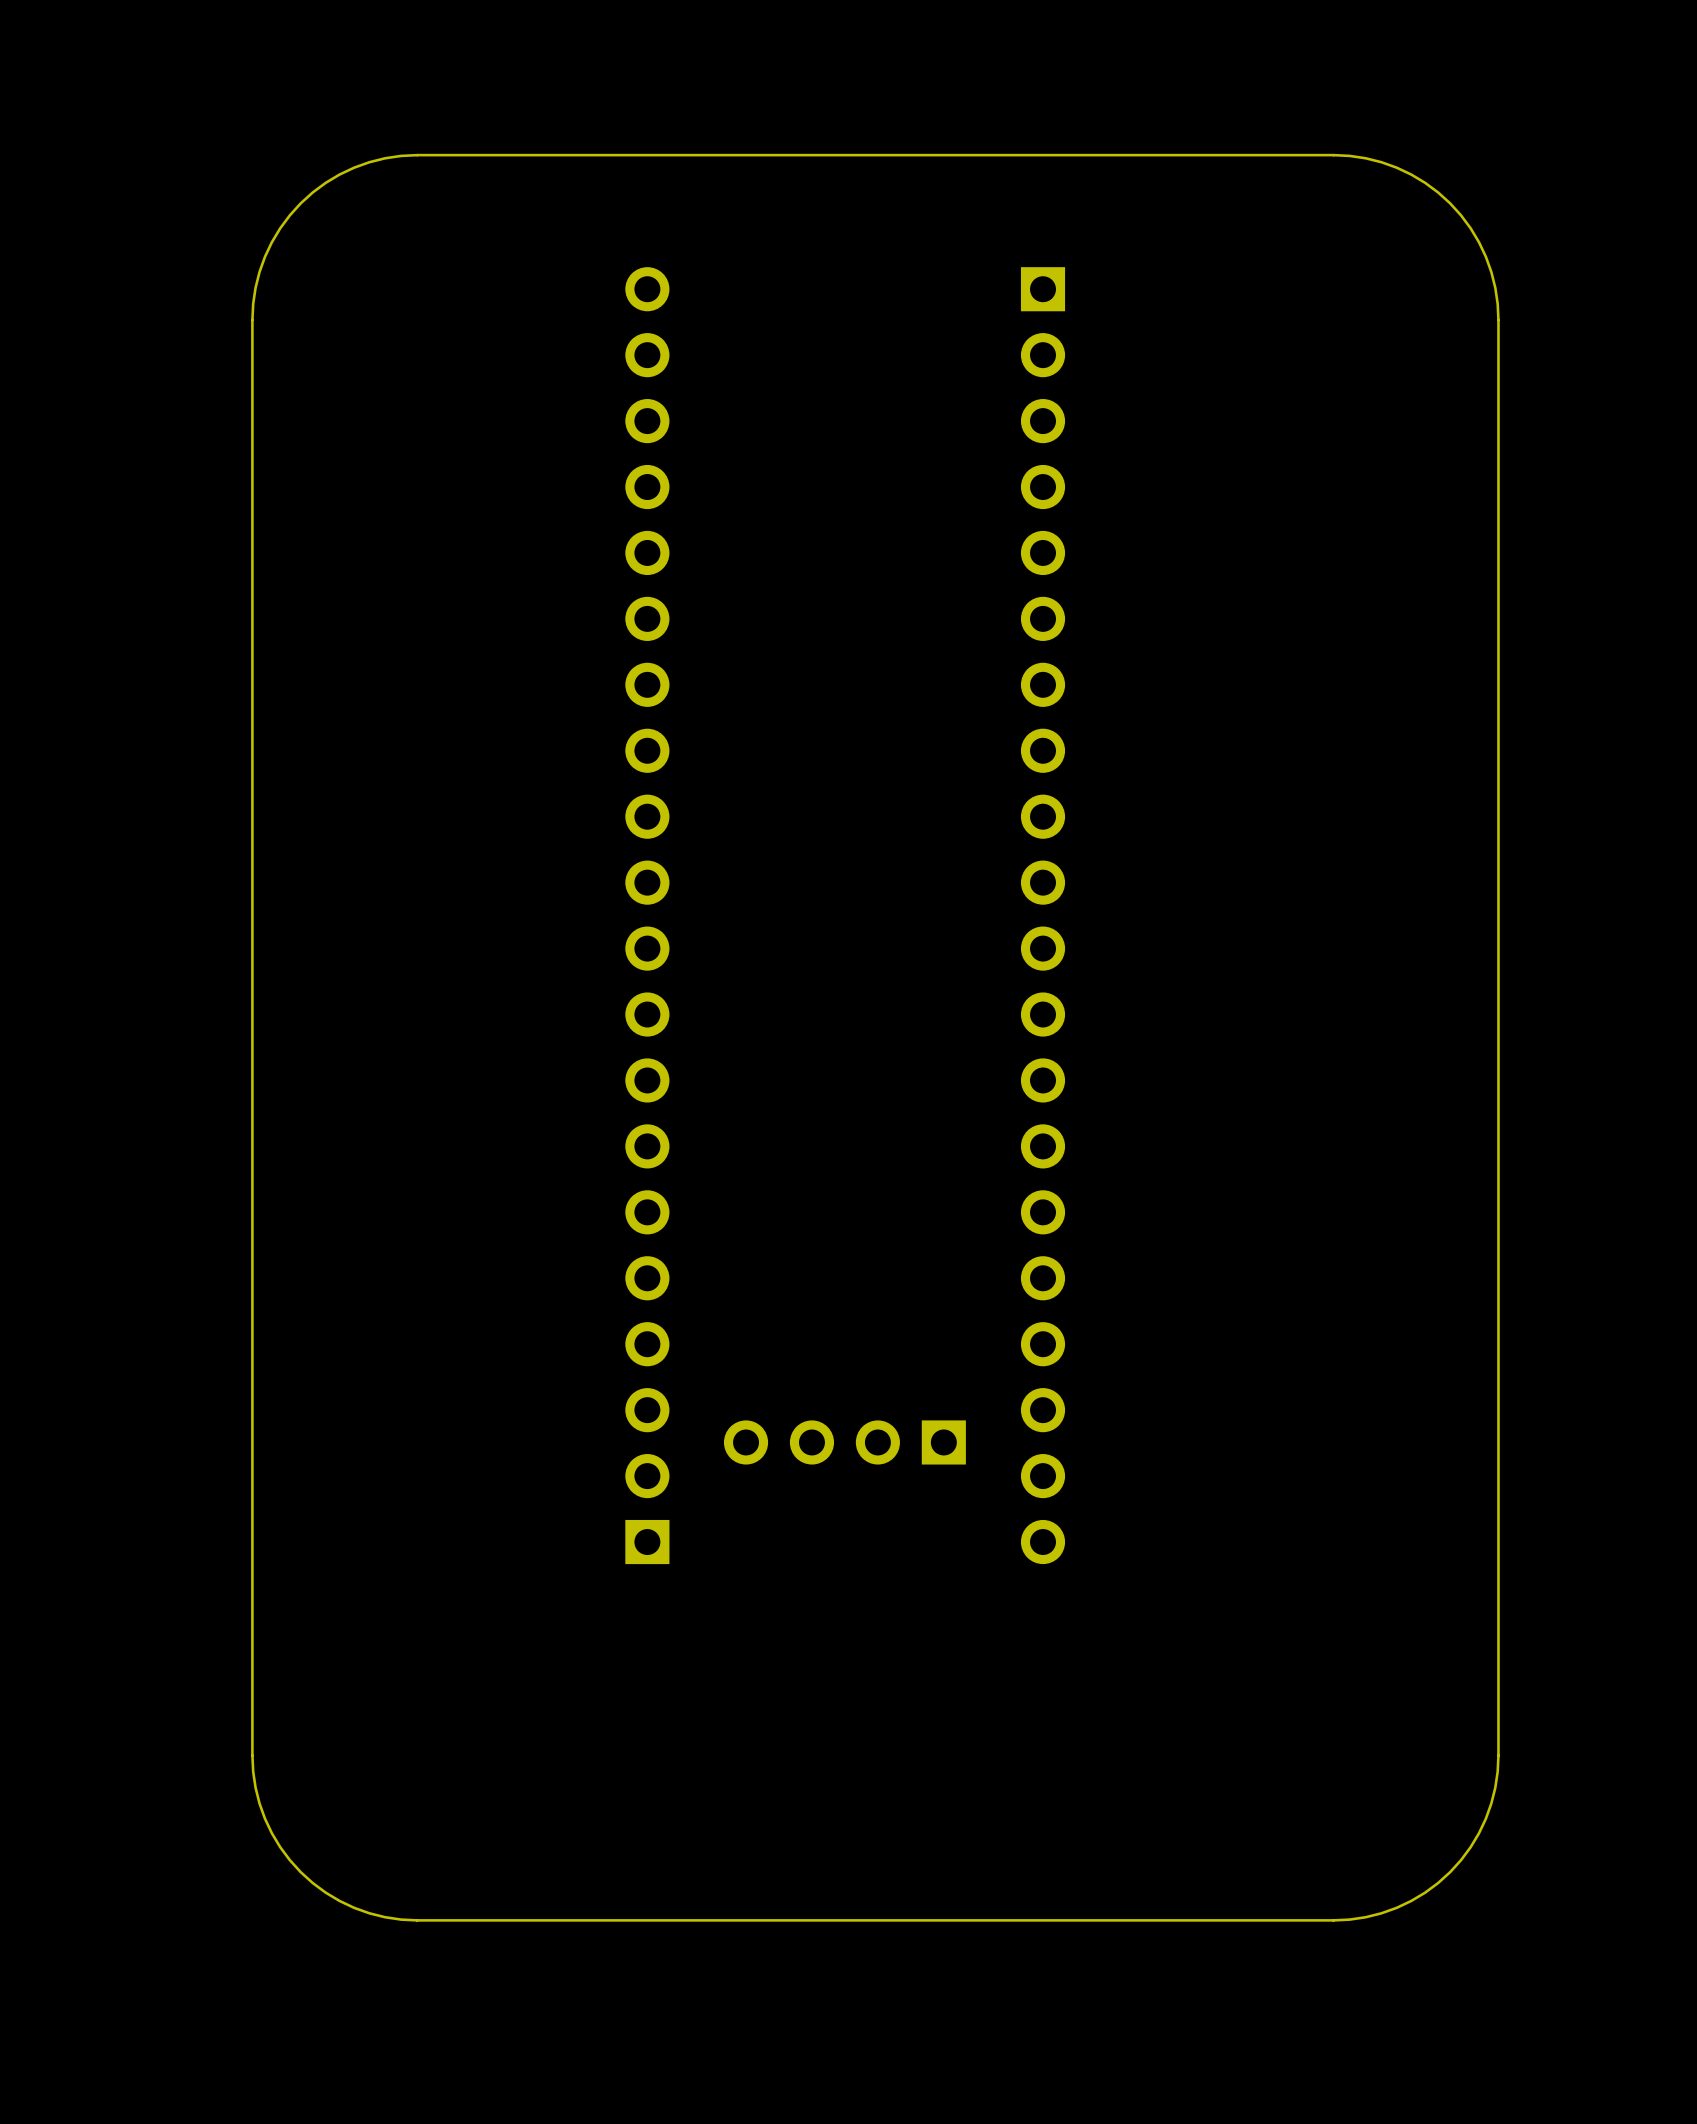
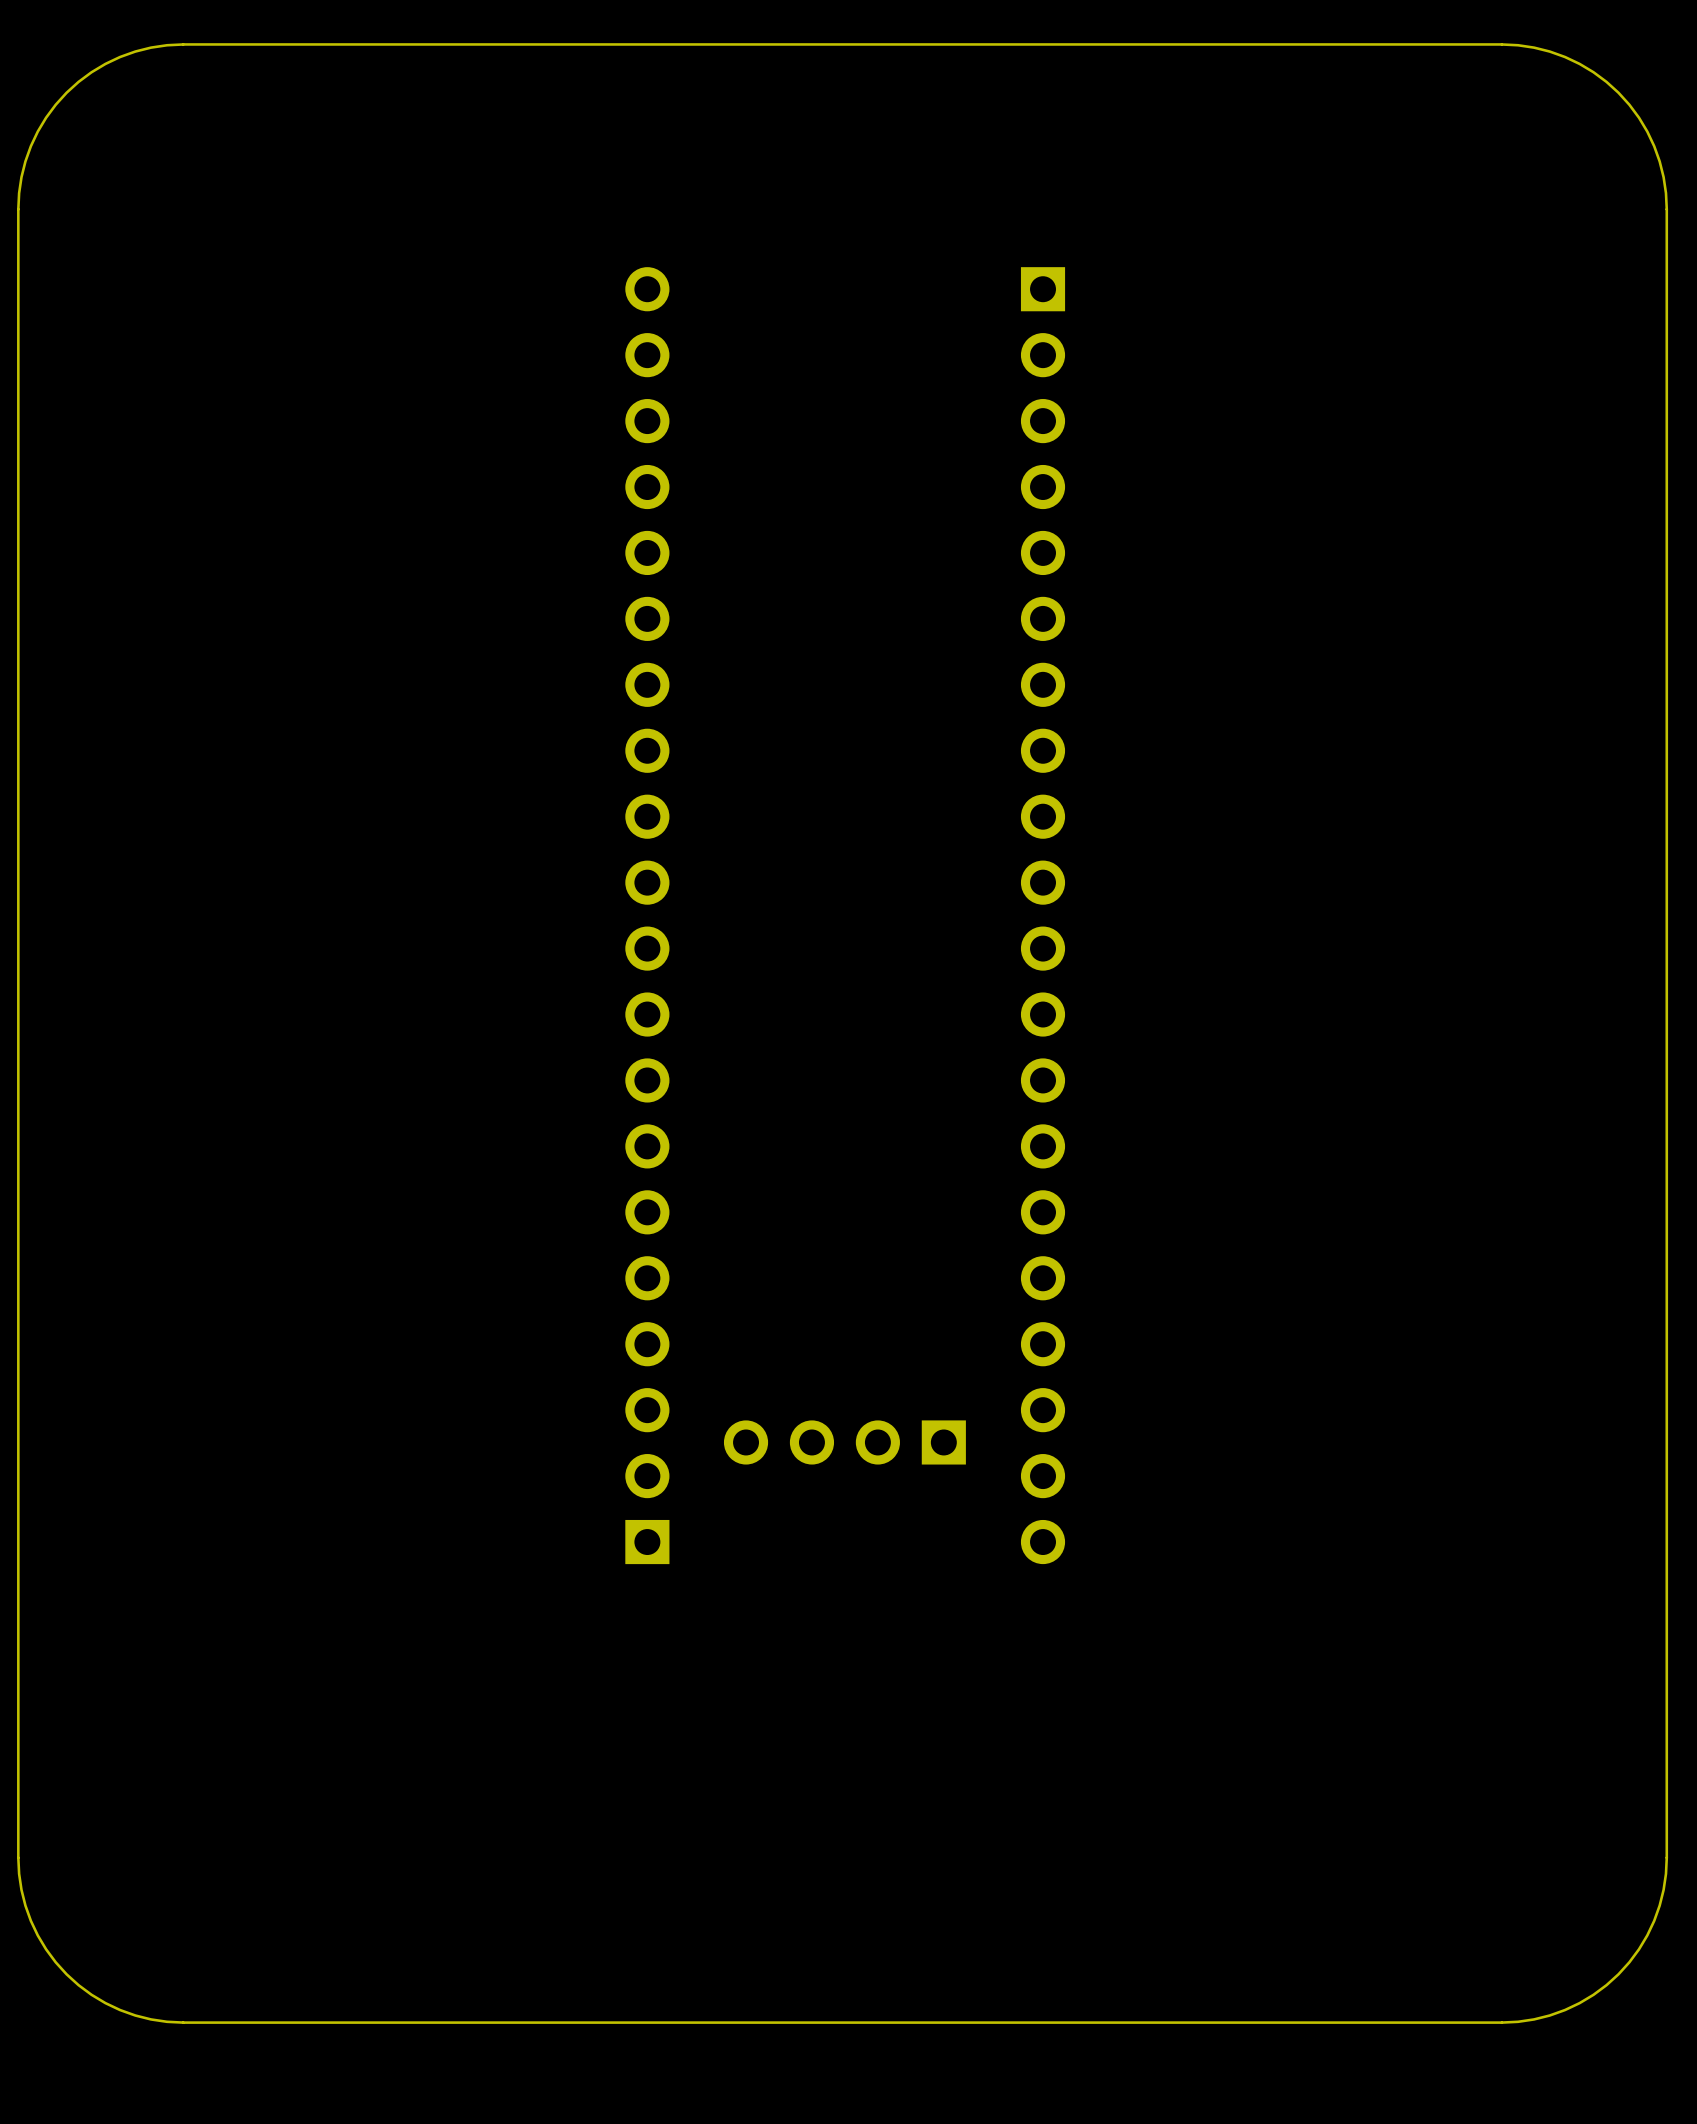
board edge: (1333, 155) (401, 155) (369, 162) (354, 167) (325, 182) (312, 192) (289, 215) (271, 242) (264, 256) (255, 287) (252, 319) (252, 1755) (255, 1787) (259, 1803) (271, 1833) (280, 1847) (300, 1872) (312, 1882) (339, 1900) (369, 1913) (385, 1917) (417, 1920) (1349, 1919) (1365, 1917) (1396, 1907) (1425, 1892) (1438, 1882) (1461, 1860) (1479, 1833) (1491, 1803) (1495, 1787) (1498, 1755) (1497, 303) (1491, 272) (1479, 242) (1461, 215) (1450, 203) (1425, 182) (1396, 167) (1365, 158) (1333, 155) -> (1501, 44) (1534, 47) (1565, 57) (1593, 72) (1618, 92) (1638, 117) (1654, 146) (1659, 161) (1665, 193) (1666, 1857) (1665, 1873) (1659, 1905) (1654, 1920) (1638, 1949) (1618, 1974) (1593, 1994) (1579, 2003) (1549, 2015) (1518, 2021) (1501, 2022) (183, 2022) (167, 2021) (135, 2015) (105, 2003) (91, 1994) (66, 1974) (46, 1949) (37, 1935) (25, 1905) (21, 1889) (18, 1857) (18, 209) (21, 177) (25, 161) (37, 131) (46, 117) (66, 92) (91, 72) (120, 57) (135, 51) (167, 45) (1501, 44)

